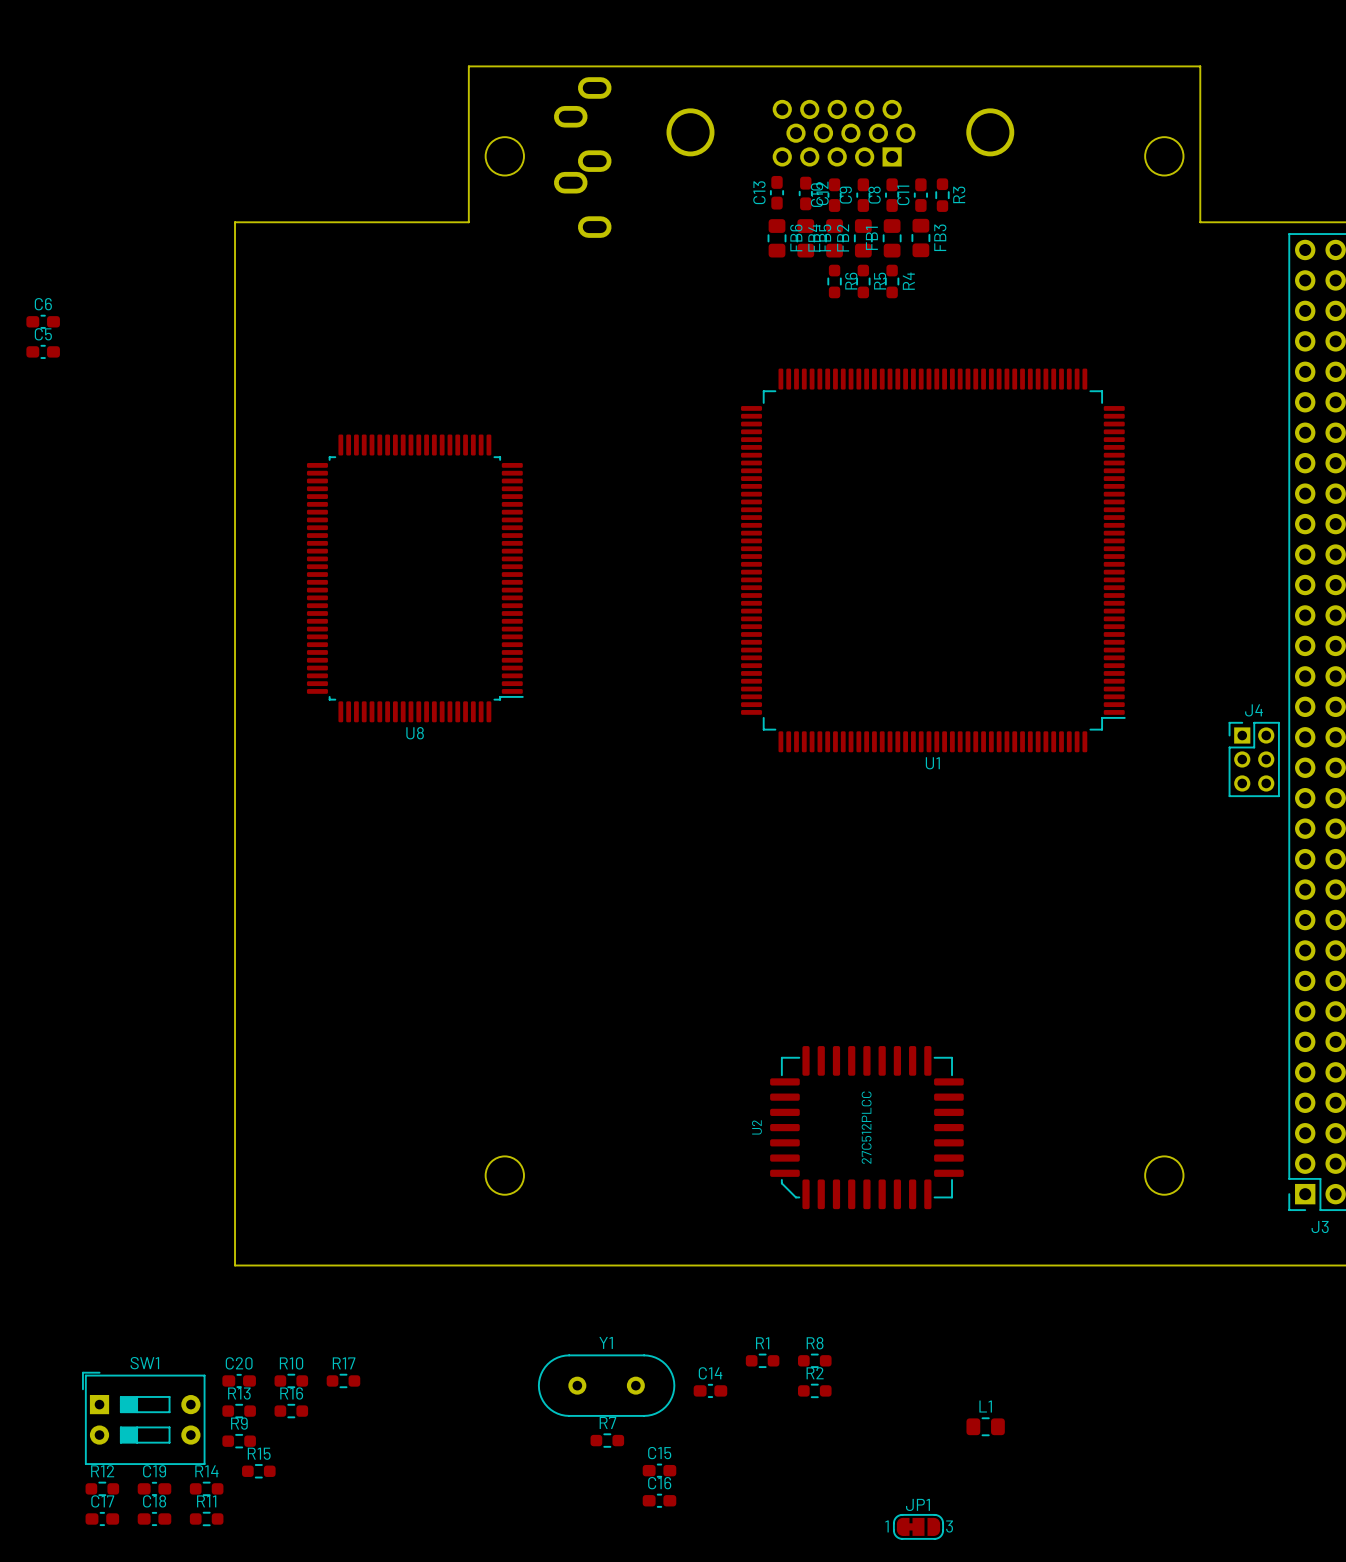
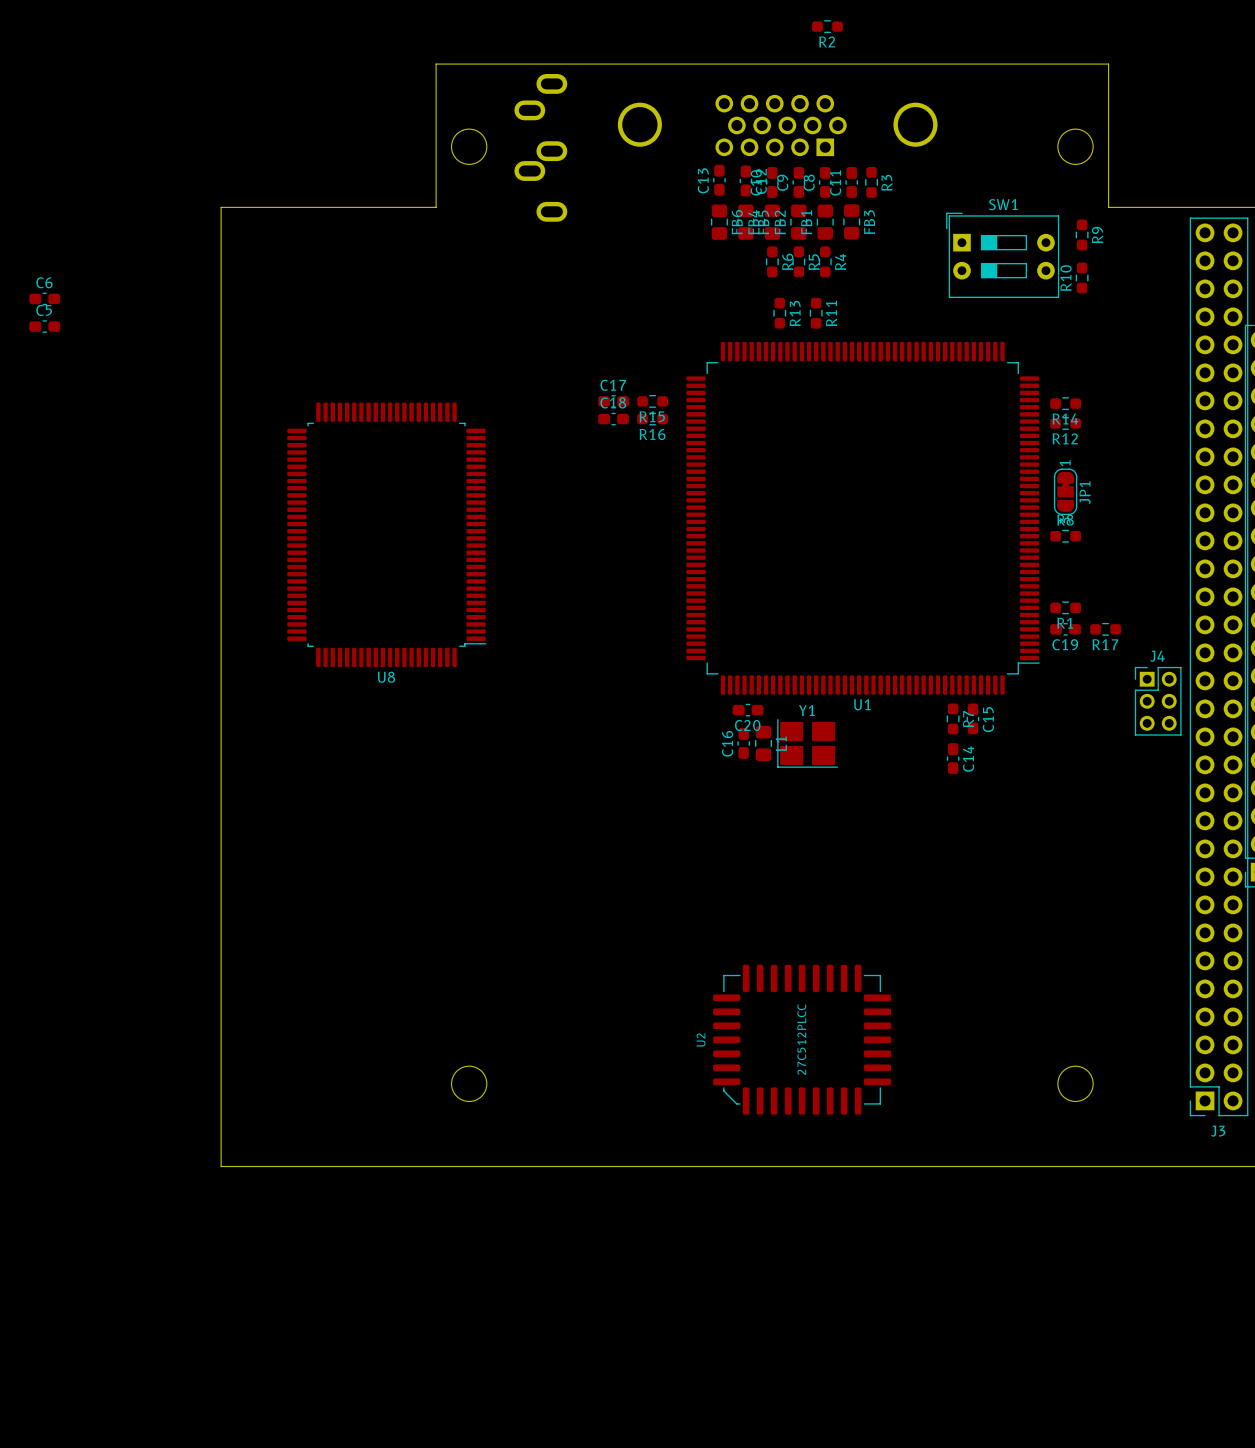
R1 name position: R1 (762, 1343) -> R1 (1065, 623)
Y1 footprint: [538, 1354, 676, 1417] -> [777, 719, 839, 768]
R1 position: (762, 1360) -> (1065, 607)
R8 position: (814, 1360) -> (1065, 536)
C20 name position: C20 (239, 1363) -> C20 (747, 725)
R10 name position: R10 (291, 1363) -> R10 (1066, 278)
R17 name position: R17 (344, 1363) -> R17 (1105, 644)
R2 name position: R2 (815, 1373) -> R2 (827, 41)
C20 position: (239, 1380) -> (748, 710)
R10 rotation: 0° (291, 1380) -> 90° clockwise (1082, 277)
R10 position: (291, 1380) -> (1082, 277)
R17 position: (343, 1380) -> (1105, 629)
C14 rotation: 0° (710, 1390) -> 90° clockwise (953, 758)
C14 position: (710, 1390) -> (953, 758)
R2 position: (814, 1390) -> (827, 26)
R16 name position: R16 (291, 1393) -> R16 (652, 434)
R13 rotation: 0° (239, 1411) -> 90° clockwise (779, 313)
R13 position: (239, 1411) -> (779, 313)
R16 position: (291, 1411) -> (652, 419)
SW1 position: (143, 1418) -> (1002, 255)
L1 rotation: 0° (985, 1426) -> 90° clockwise (763, 743)
L1 position: (985, 1426) -> (763, 743)
R7 rotation: 0° (607, 1440) -> 90° clockwise (953, 718)
R7 position: (607, 1440) -> (953, 718)
R9 rotation: 0° (239, 1441) -> 90° clockwise (1082, 234)
R9 position: (239, 1441) -> (1082, 234)
R15 name position: R15 (259, 1453) -> R15 (652, 416)
C15 rotation: 0° (659, 1470) -> 90° clockwise (972, 718)
C15 position: (659, 1470) -> (972, 718)
R12 name position: R12 (102, 1471) -> R12 (1065, 438)
C19 name position: C19 (154, 1471) -> C19 (1065, 644)
R14 name position: R14 (206, 1471) -> R14 (1065, 418)
R15 position: (258, 1471) -> (652, 401)
C16 name position: C16 (659, 1483) -> C16 (727, 743)
R12 position: (102, 1488) -> (1065, 423)
C19 position: (154, 1488) -> (1065, 629)
R14 position: (206, 1488) -> (1065, 403)
C16 rotation: 0° (659, 1500) -> 90° clockwise (743, 743)
C16 position: (659, 1500) -> (743, 743)
C17 position: (102, 1518) -> (613, 401)
C18 position: (154, 1518) -> (613, 419)
R11 rotation: 0° (206, 1518) -> 90° clockwise (816, 313)
R11 position: (206, 1518) -> (816, 313)
JP1 rotation: 0° (918, 1526) -> 90° clockwise (1065, 491)
JP1 position: (918, 1526) -> (1065, 491)

